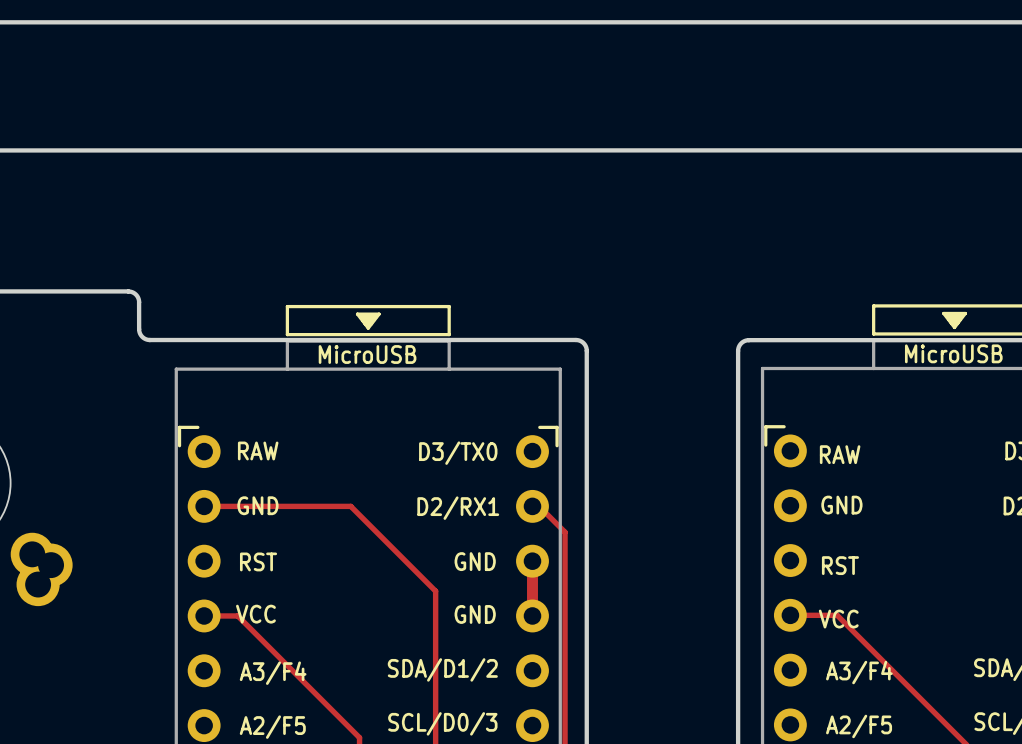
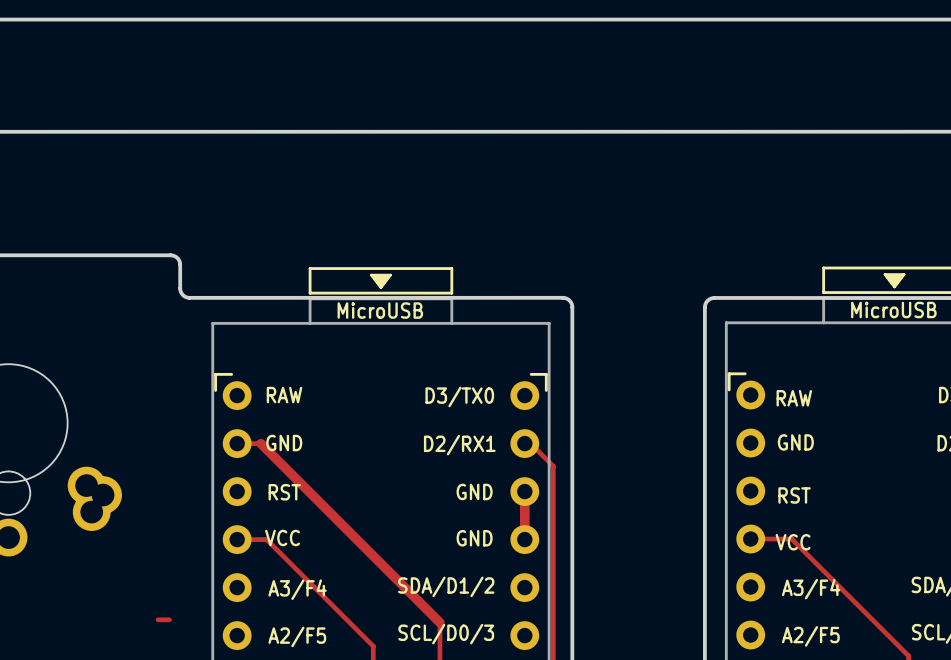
track: (231, 506) (350, 506) (435, 591) (435, 710) -> (260, 443) (439, 622)
track: none -> (158, 619) (169, 619)

